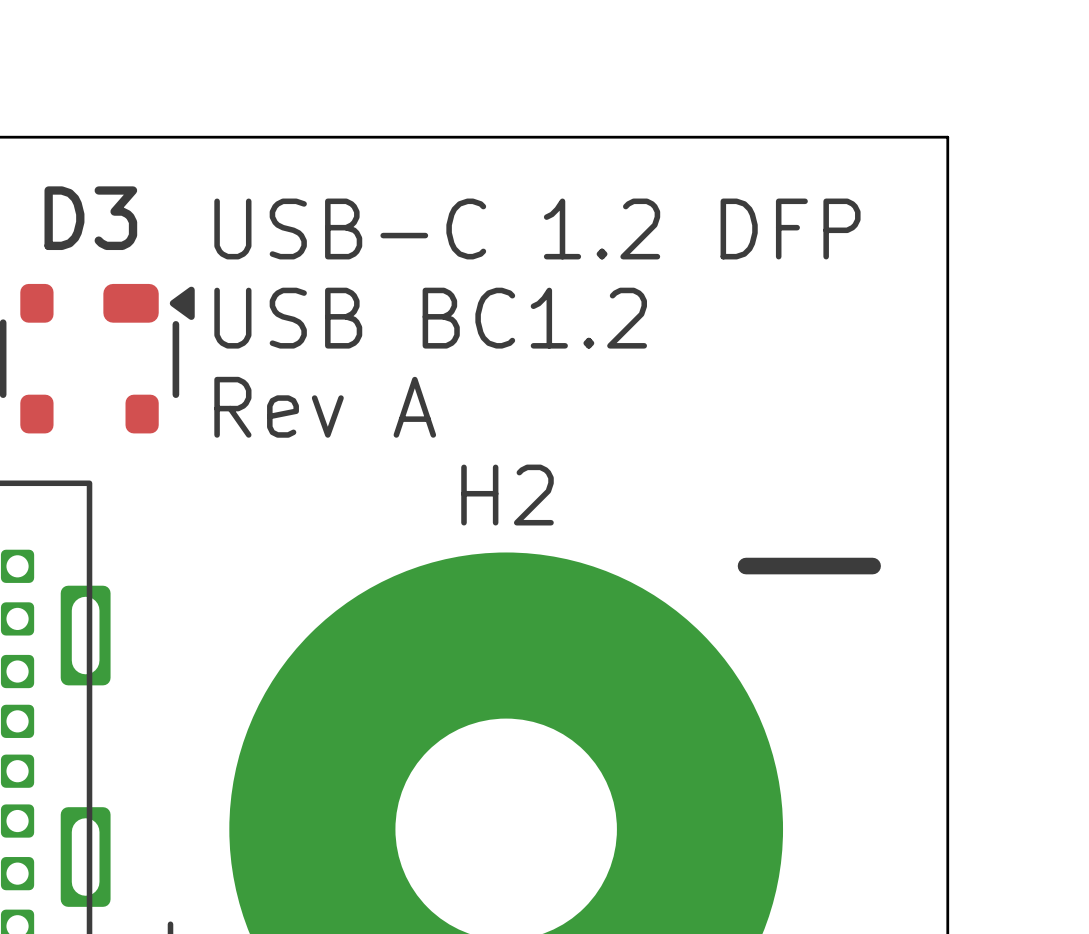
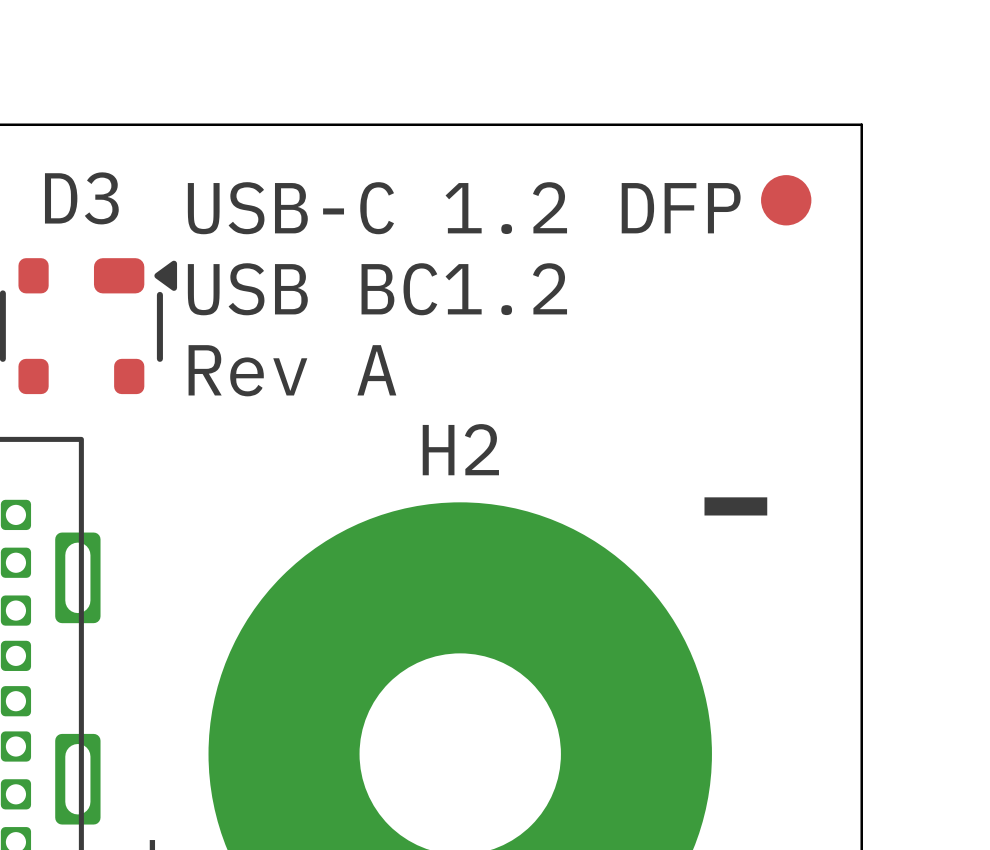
part: none -> (786, 200)

